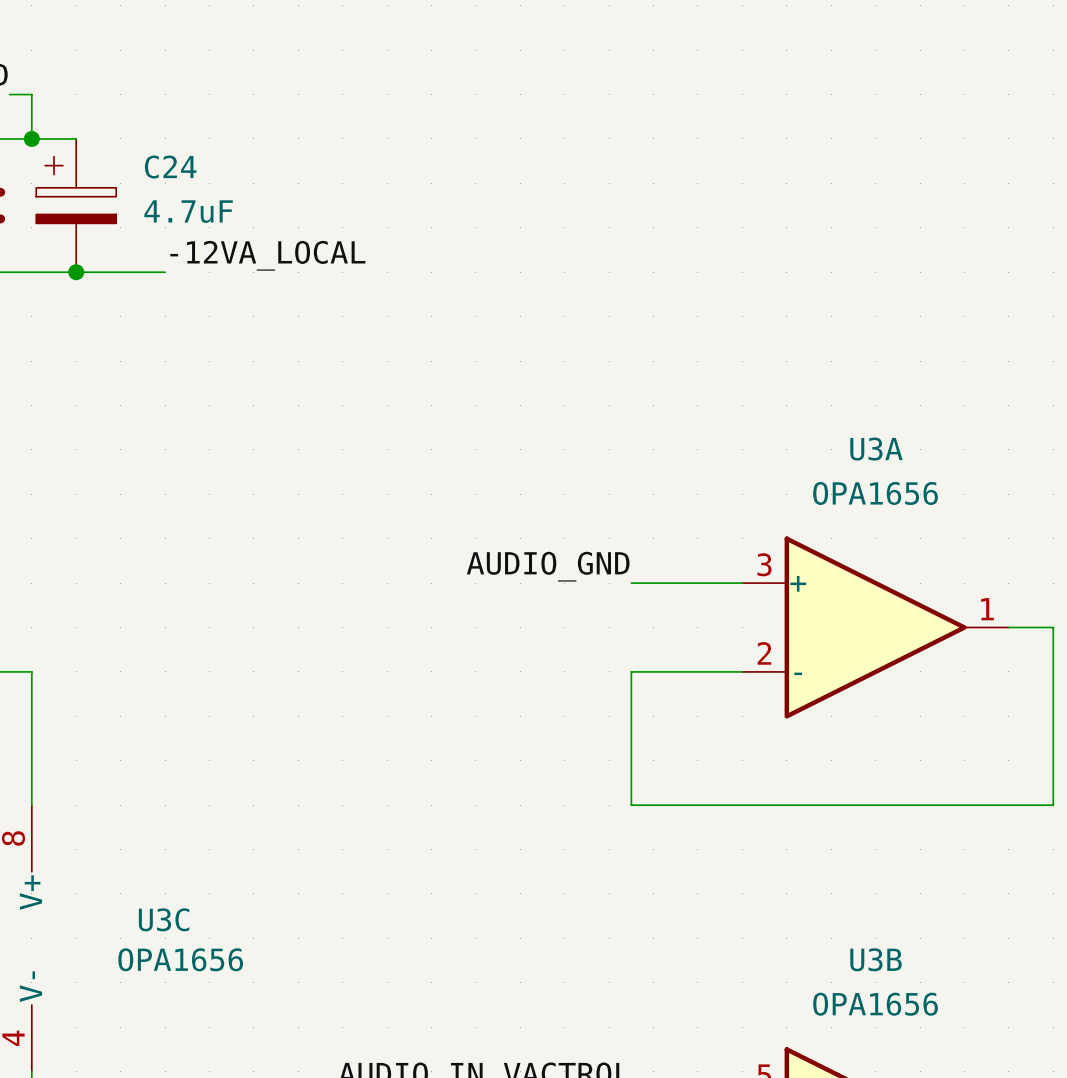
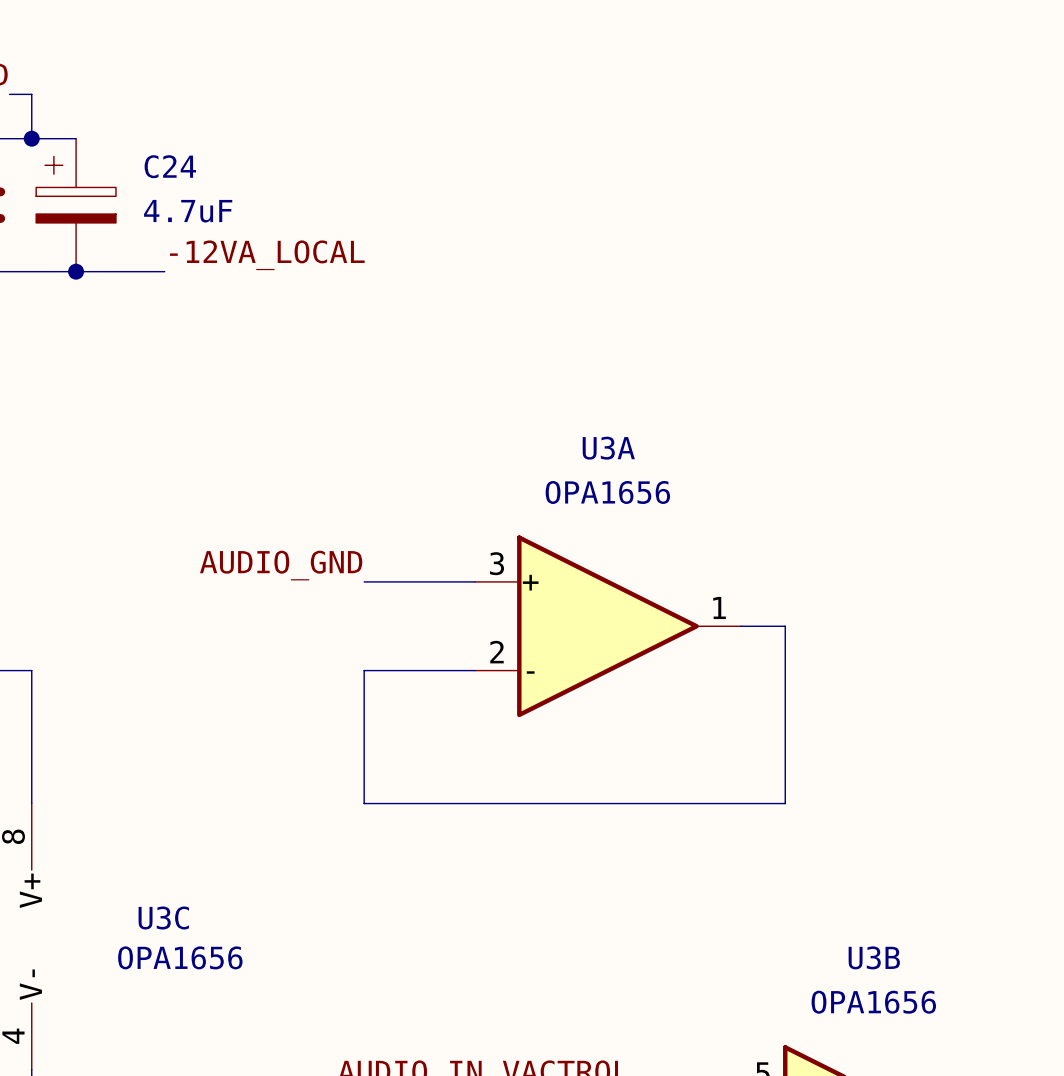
label position: AUDIO_GND (548, 566) -> AUDIO_GND (281, 565)
wire: (631, 583) (742, 583) -> (364, 581) (474, 581)
U3A position: (875, 627) -> (607, 626)
wire: (1008, 627) (1053, 627) (1053, 805) (786, 805) -> (740, 626) (785, 626) (785, 803)
wire: (742, 671) (631, 671) (631, 805) -> (474, 670) (364, 670) (364, 803) (630, 803)

